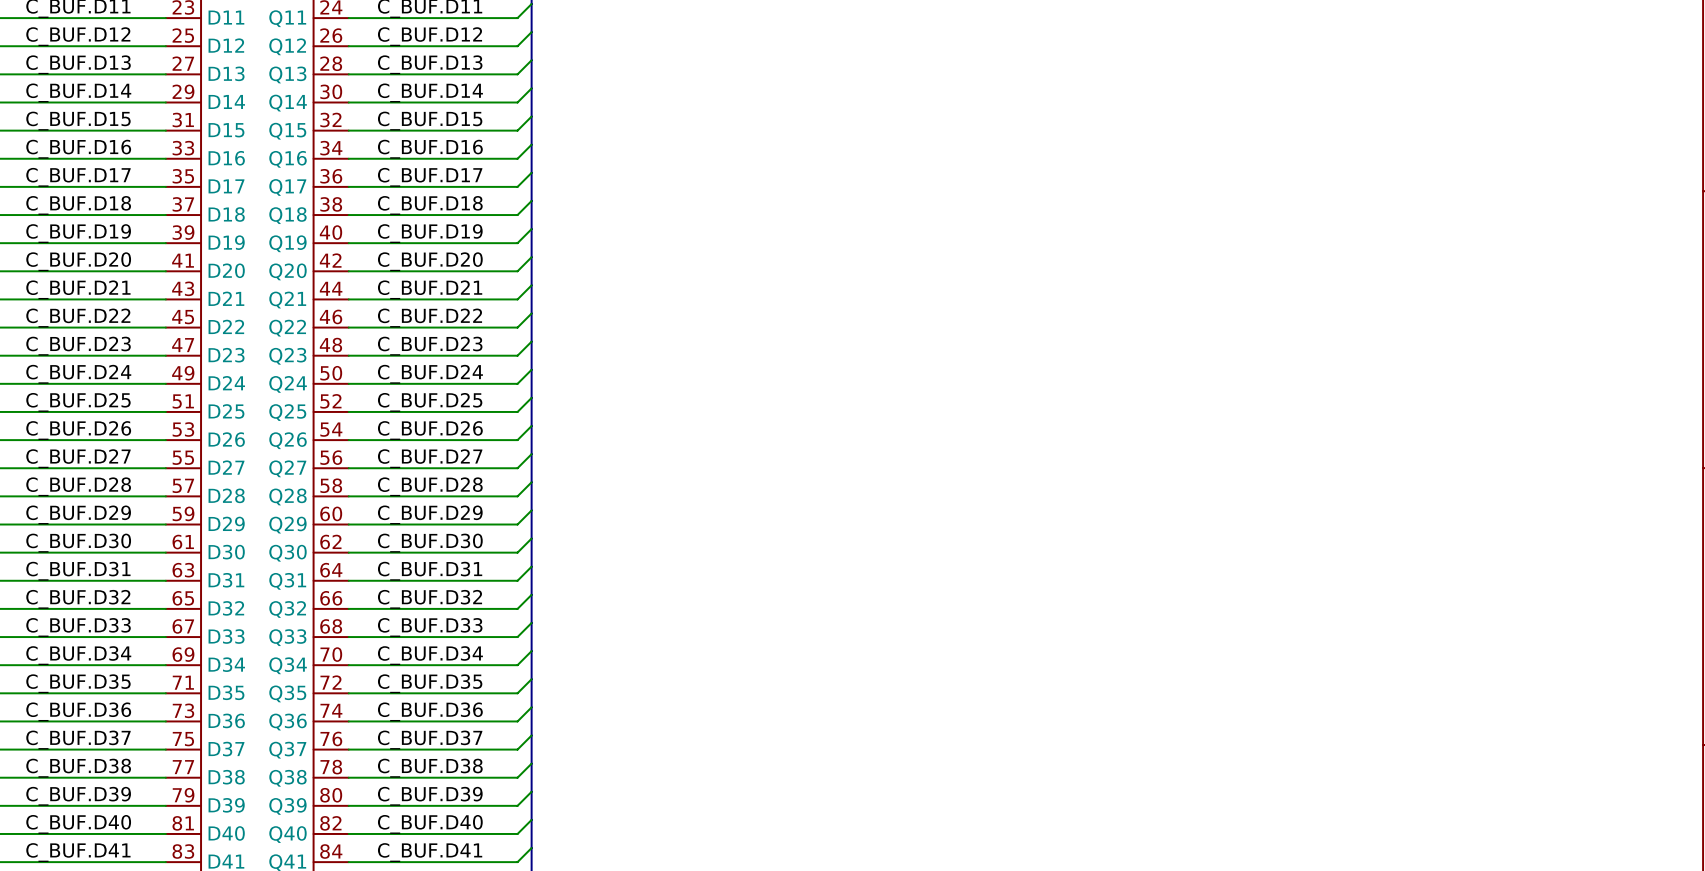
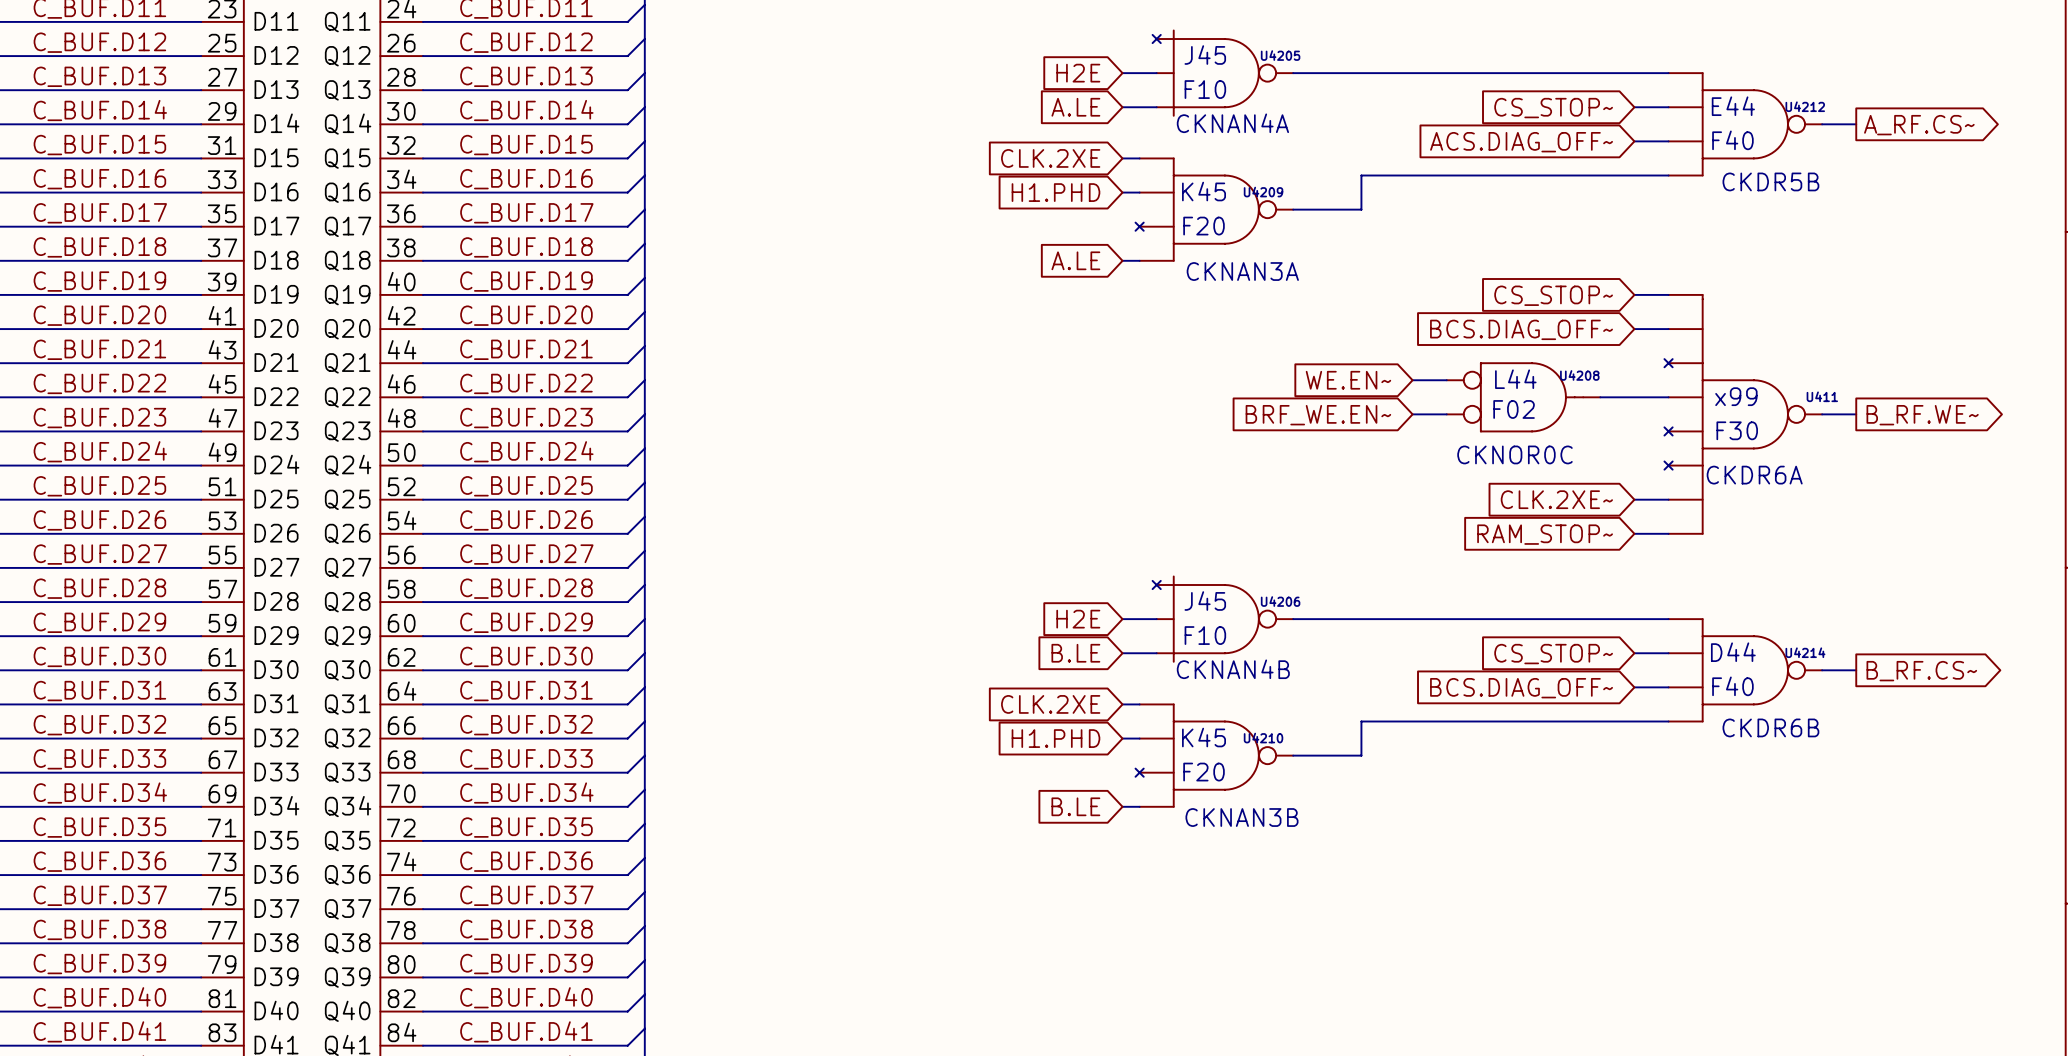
no-connect mark: none -> (1156, 39)
global label: none -> H2E (1078, 73)
wire: none -> (1122, 73) (1156, 73)
U4205: none -> F10 (1224, 73)
wire: none -> (1293, 73) (1668, 73)
global label: none -> A.LE (1075, 107)
wire: none -> (1122, 107) (1156, 107)
wire: none -> (1634, 107) (1668, 107)
global label: none -> CS_STOP~ (1553, 108)
U4212: none -> F40 (1745, 124)
wire: none -> (1822, 124) (1856, 124)
global label: none -> A_RF.CS~ (1919, 125)
wire: none -> (1634, 141) (1668, 141)
global label: none -> ACS.DIAG_OFF~ (1521, 142)
global label: none -> CLK.2XE (1050, 158)
wire: none -> (1122, 158) (1139, 158)
wire: none -> (1668, 175) (1361, 175) (1361, 209) (1293, 209)
global label: none -> H1.PHD (1055, 192)
wire: none -> (1122, 192) (1139, 192)
U4209: none -> F20 (1216, 209)
no-connect mark: none -> (1139, 226)
global label: none -> A.LE (1075, 260)
wire: none -> (1122, 260) (1139, 260)
wire: none -> (1634, 294) (1668, 294)
global label: none -> CS_STOP~ (1553, 295)
wire: none -> (1634, 329) (1668, 329)
global label: none -> BCS.DIAG_OFF~ (1521, 329)
no-connect mark: none -> (1668, 363)
global label: none -> WE.EN~ (1348, 380)
wire: none -> (1412, 380) (1446, 380)
U4208: none -> F02 (1523, 397)
wire: none -> (1600, 397) (1668, 397)
wire: none -> (1412, 414) (1446, 414)
U411: none -> F30 (1745, 414)
wire: none -> (1822, 414) (1856, 414)
global label: none -> BRF_WE.EN~ (1318, 415)
global label: none -> B_RF.WE~ (1922, 415)
no-connect mark: none -> (1668, 431)
no-connect mark: none -> (1668, 465)
global label: none -> CLK.2XE~ (1556, 499)
wire: none -> (1634, 499) (1668, 499)
wire: none -> (1634, 533) (1668, 533)
global label: none -> RAM_STOP~ (1545, 534)
no-connect mark: none -> (1156, 585)
global label: none -> H2E (1078, 619)
wire: none -> (1122, 619) (1156, 619)
U4206: none -> F10 (1224, 619)
wire: none -> (1293, 619) (1668, 619)
global label: none -> B.LE (1075, 653)
wire: none -> (1122, 653) (1156, 653)
wire: none -> (1634, 653) (1668, 653)
global label: none -> CS_STOP~ (1553, 654)
U4214: none -> F40 (1745, 670)
wire: none -> (1822, 670) (1856, 670)
global label: none -> B_RF.CS~ (1921, 671)
wire: none -> (1634, 687) (1668, 687)
global label: none -> BCS.DIAG_OFF~ (1521, 688)
global label: none -> CLK.2XE (1050, 704)
wire: none -> (1122, 704) (1139, 704)
wire: none -> (1668, 721) (1361, 721) (1361, 755) (1293, 755)
global label: none -> H1.PHD (1055, 738)
wire: none -> (1122, 738) (1139, 738)
U4210: none -> F20 (1216, 755)
no-connect mark: none -> (1139, 772)
global label: none -> B.LE (1075, 806)
wire: none -> (1122, 806) (1139, 806)

